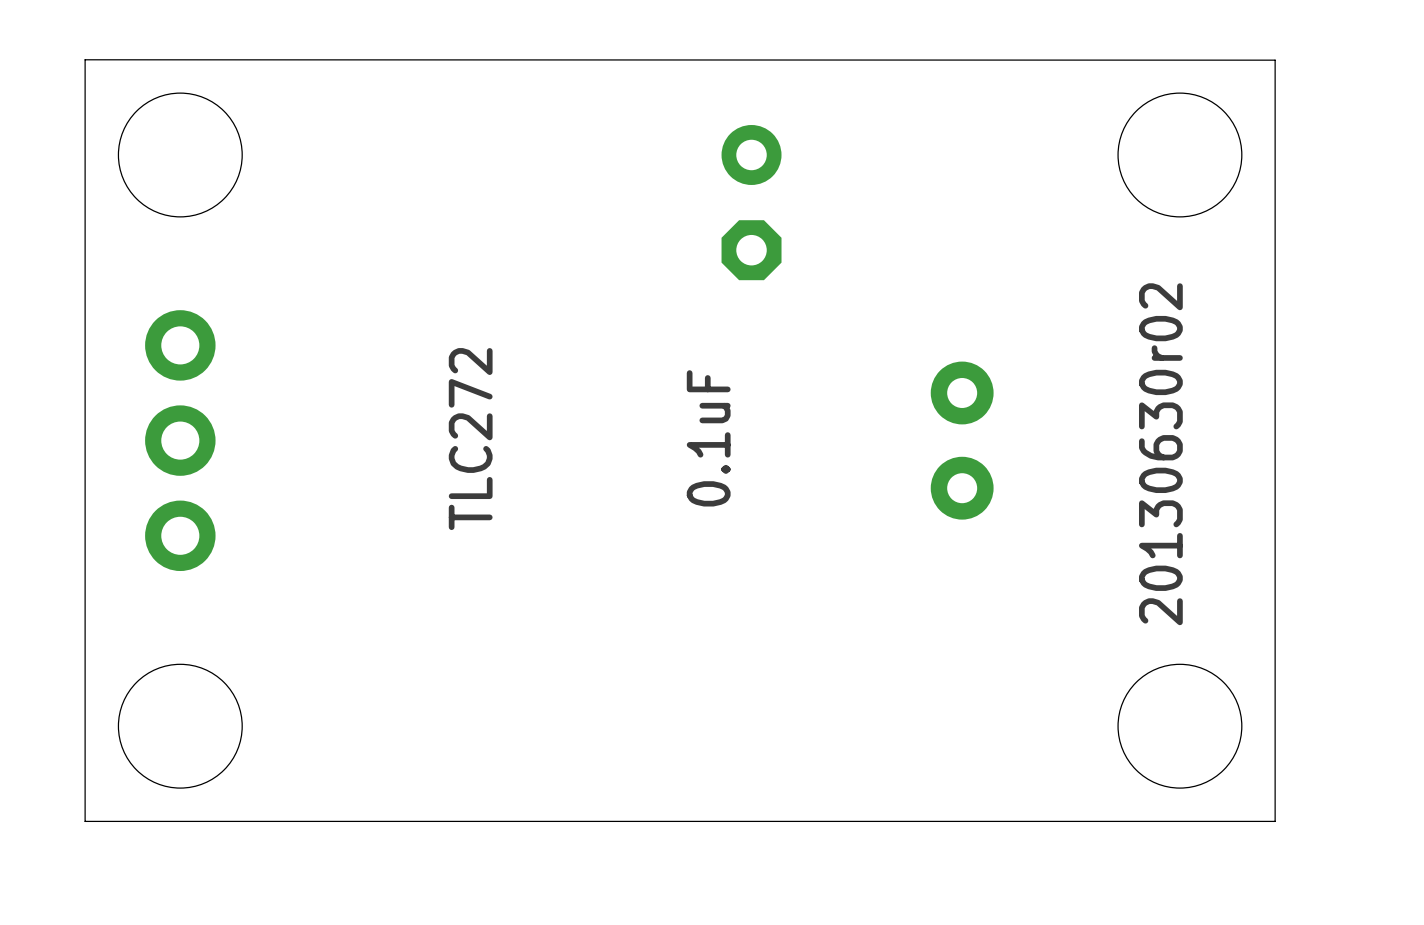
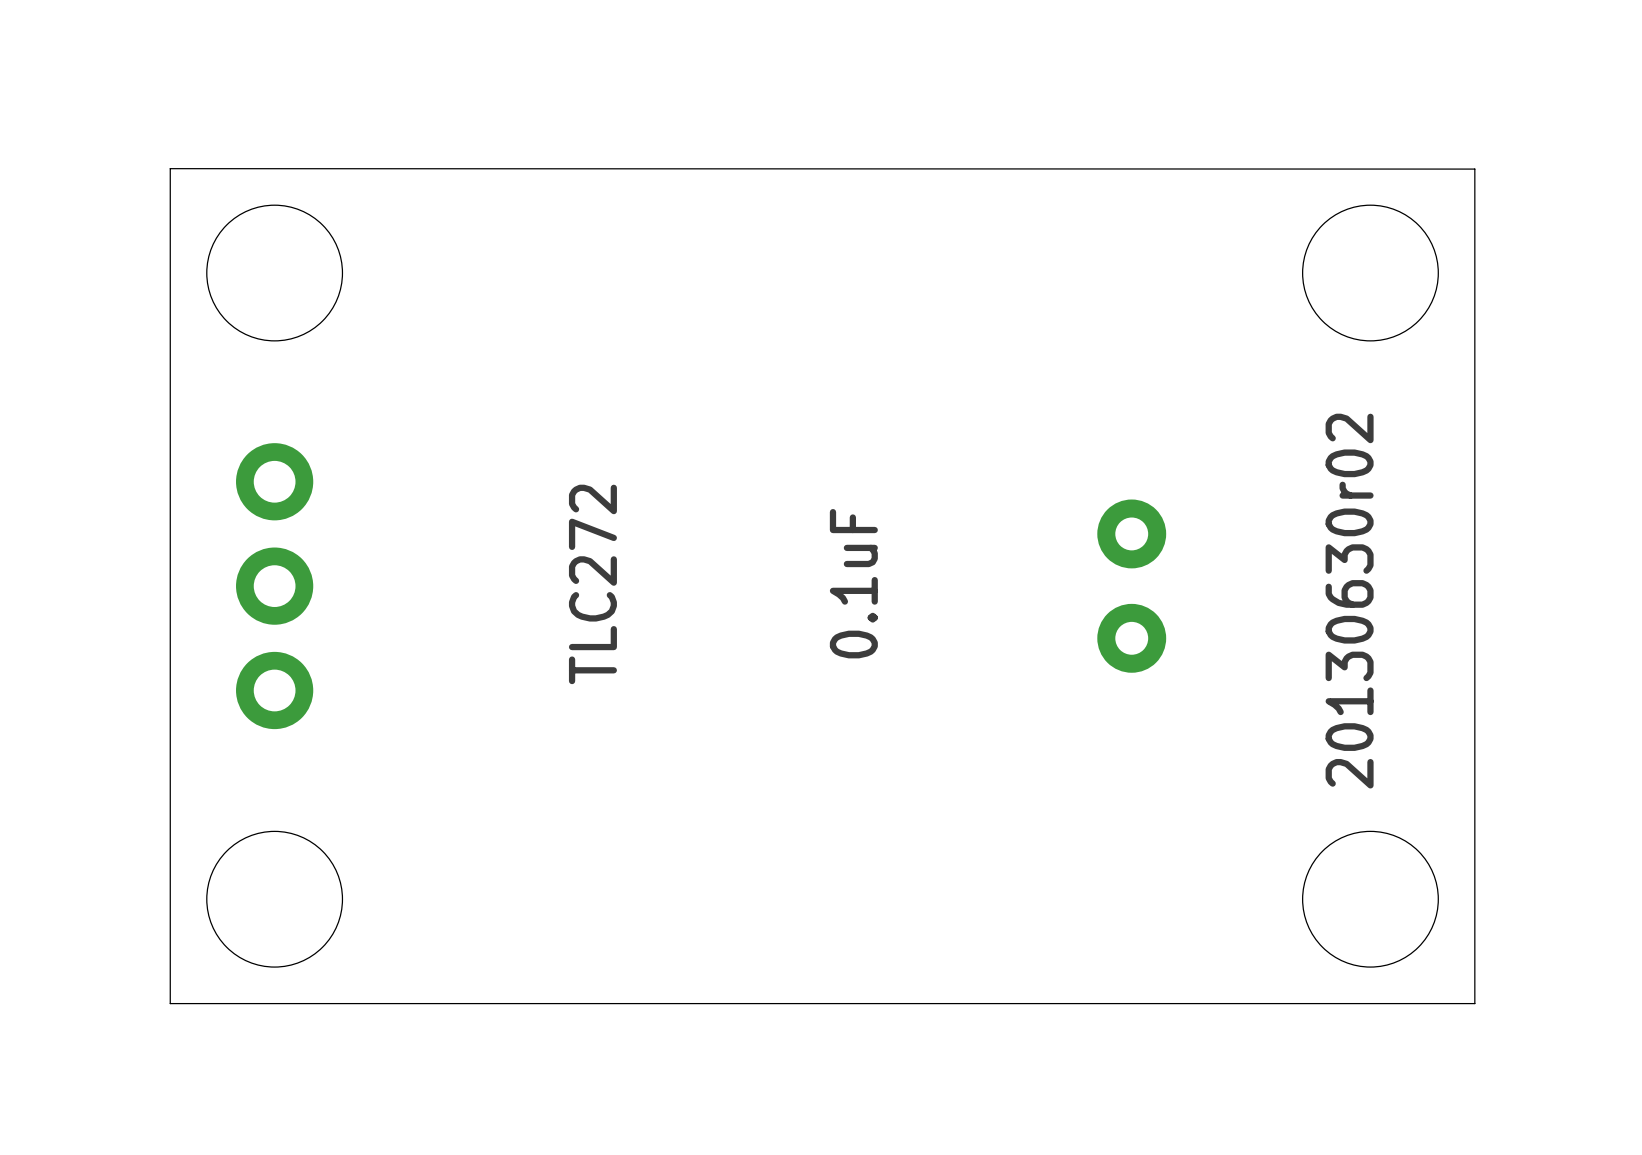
part: (751, 202) -> none

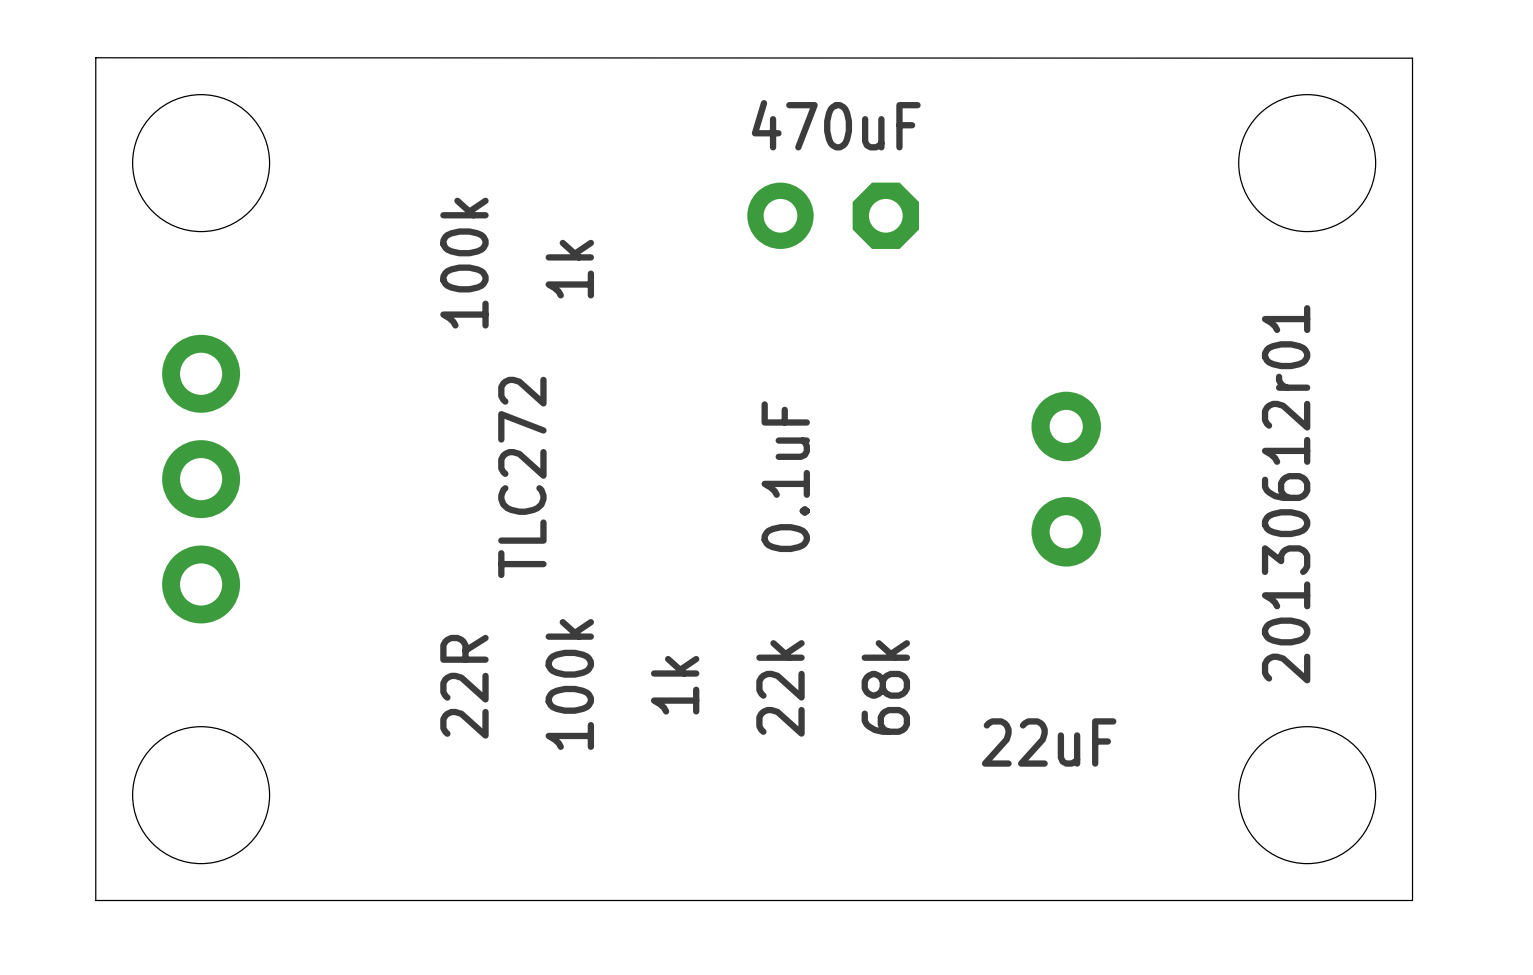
text: none -> 470uF (836, 125)
part: none -> (833, 215)
text: none -> 100k (464, 263)
text: none -> 1k (569, 269)
text: 20130630r02 (1349, 601) -> 20130612r01 (1286, 494)
text: none -> 100k (569, 684)
text: none -> 1k (675, 685)
text: none -> 22R (464, 686)
text: none -> 68k (885, 687)
text: none -> 22k (780, 688)
text: none -> 22uF (1049, 742)

